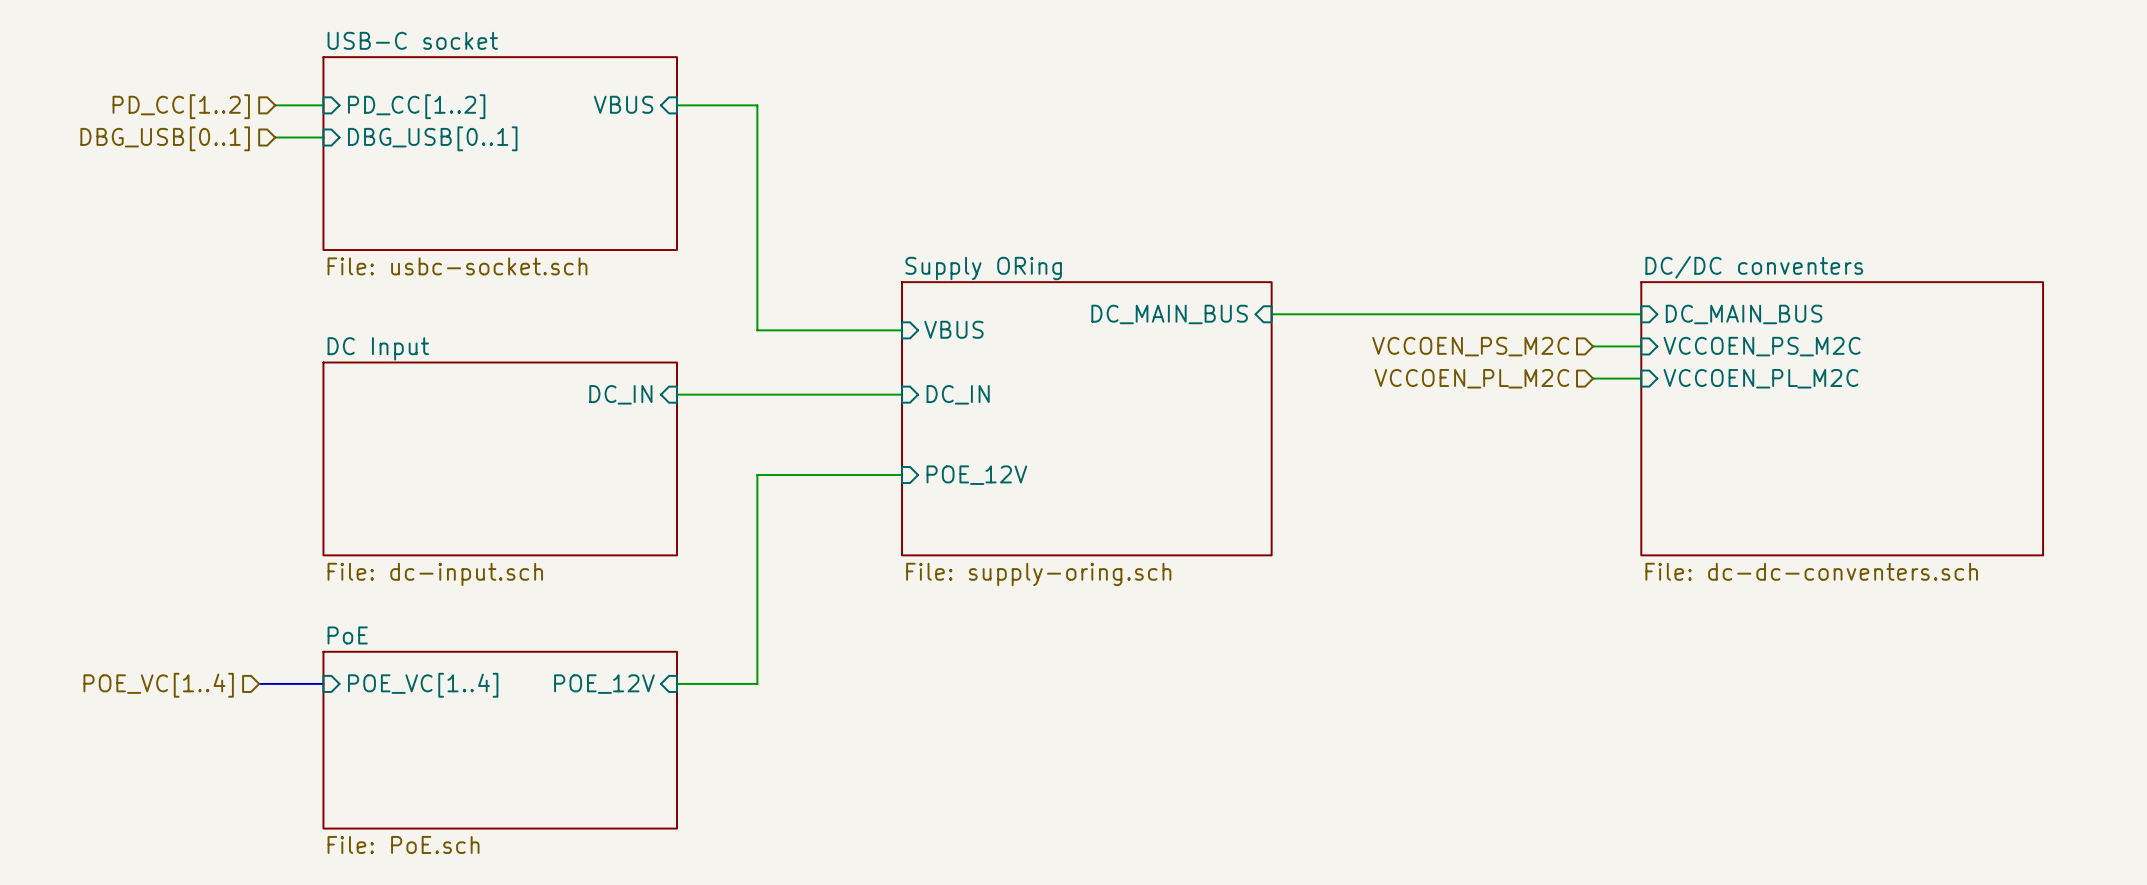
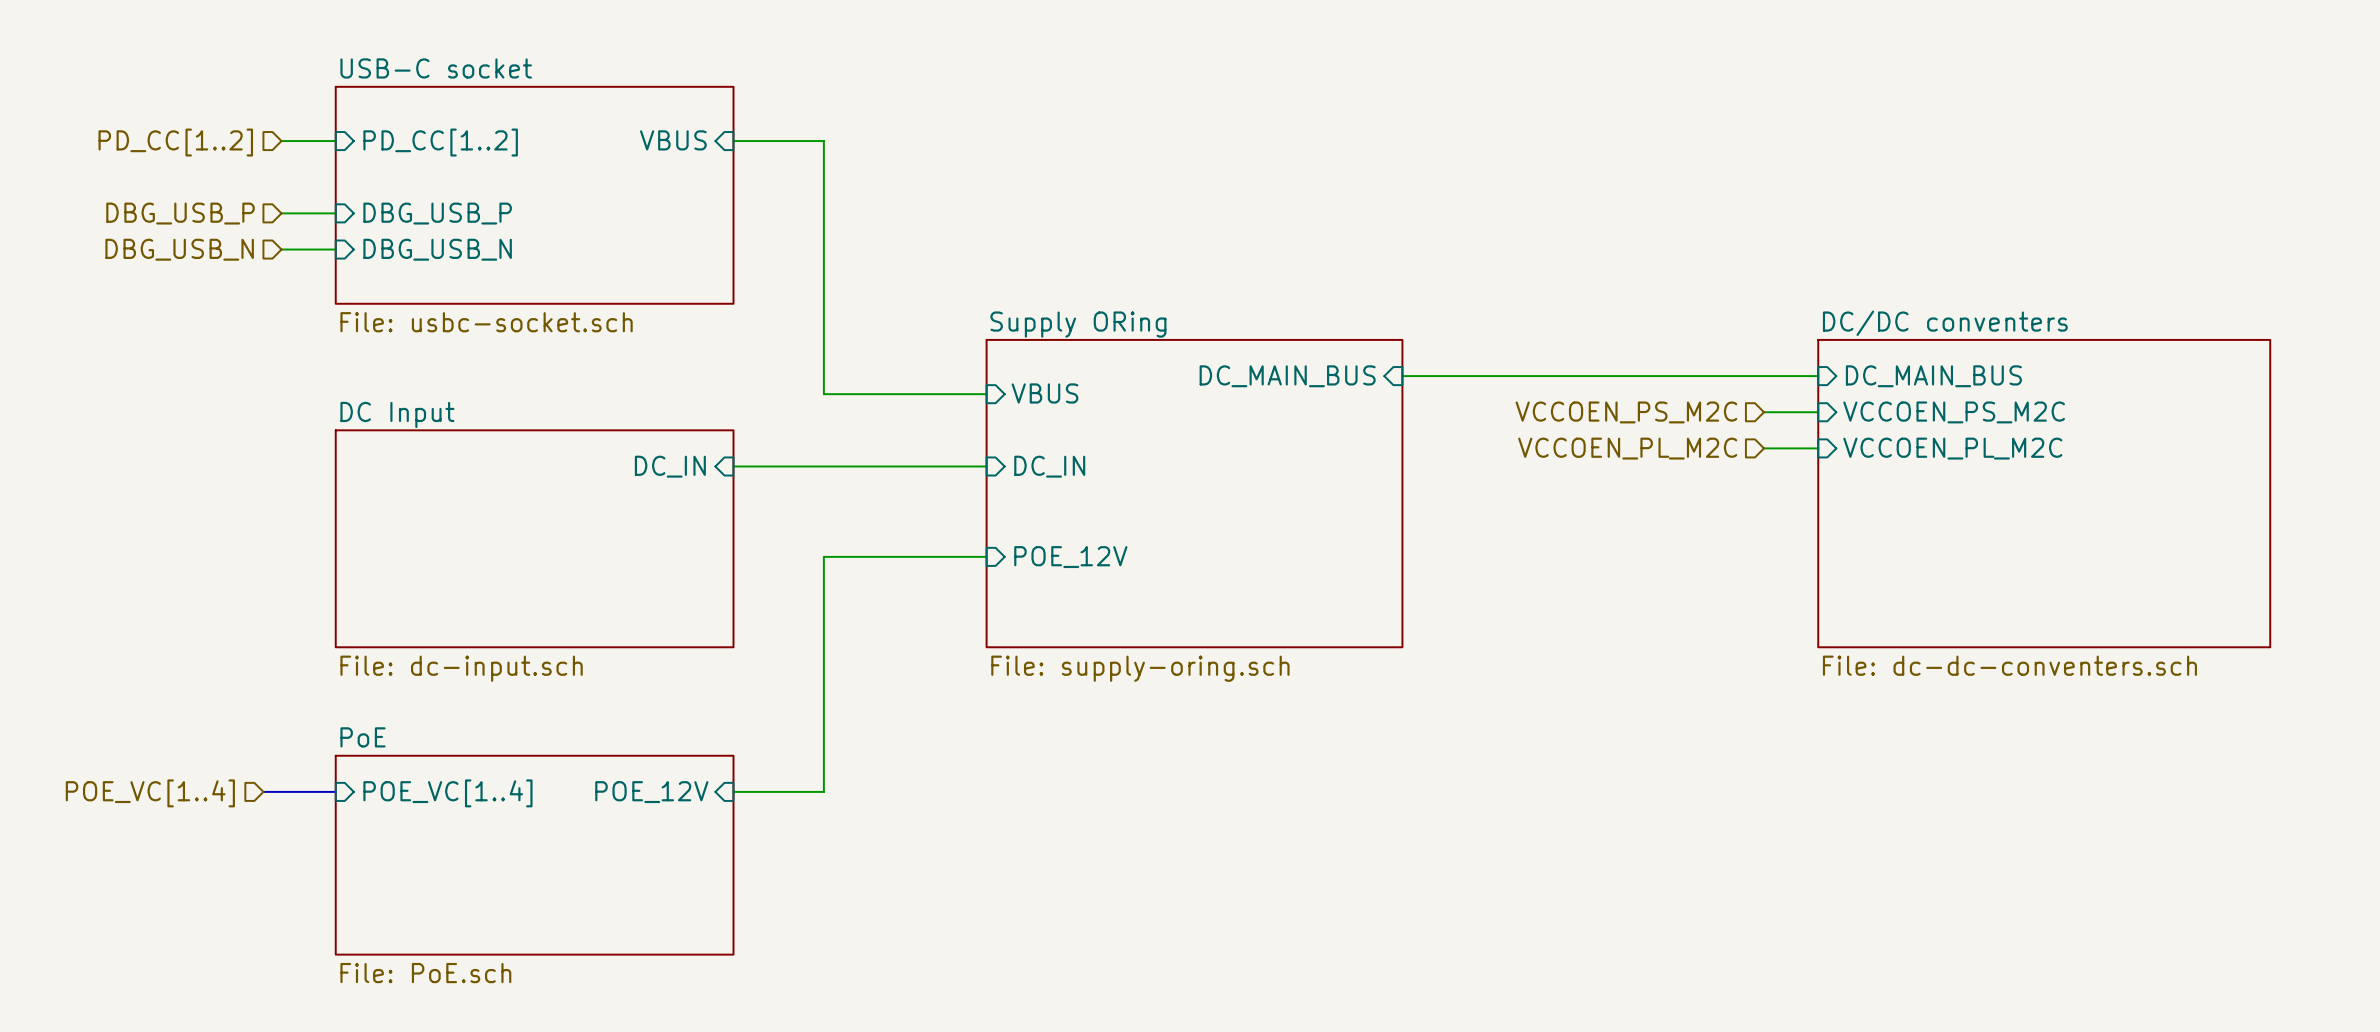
wire: (275, 137) (323, 137) -> (281, 213) (335, 213)
hierarchical label: DBG_USB[0..1] (165, 138) -> DBG_USB_P (180, 213)
sheet pin: DBG_USB[0..1] (432, 138) -> DBG_USB_P (437, 213)
hierarchical label: none -> DBG_USB_N (179, 249)
wire: none -> (281, 249) (335, 249)
sheet pin: none -> DBG_USB_N (437, 249)

